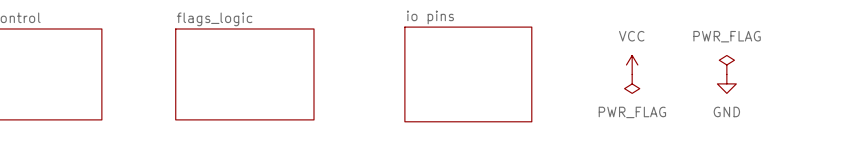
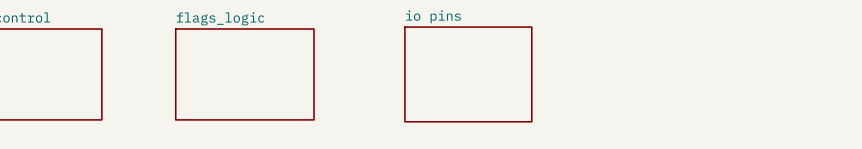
power symbol: VCC (632, 64) -> none
power symbol: PWR_FLAG (726, 64) -> none
power symbol: PWR_FLAG (632, 83) -> none
power symbol: GND (726, 83) -> none

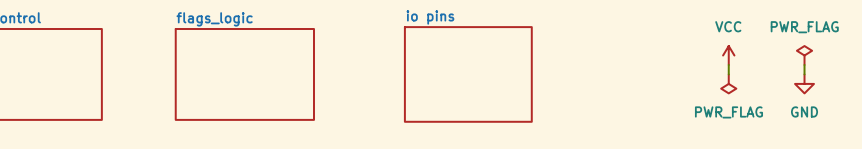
power symbol: none -> VCC (728, 55)
power symbol: none -> PWR_FLAG (804, 55)
wire: none -> (728, 64) (728, 74)
wire: none -> (804, 64) (804, 74)
power symbol: none -> PWR_FLAG (728, 83)
power symbol: none -> GND (804, 83)

